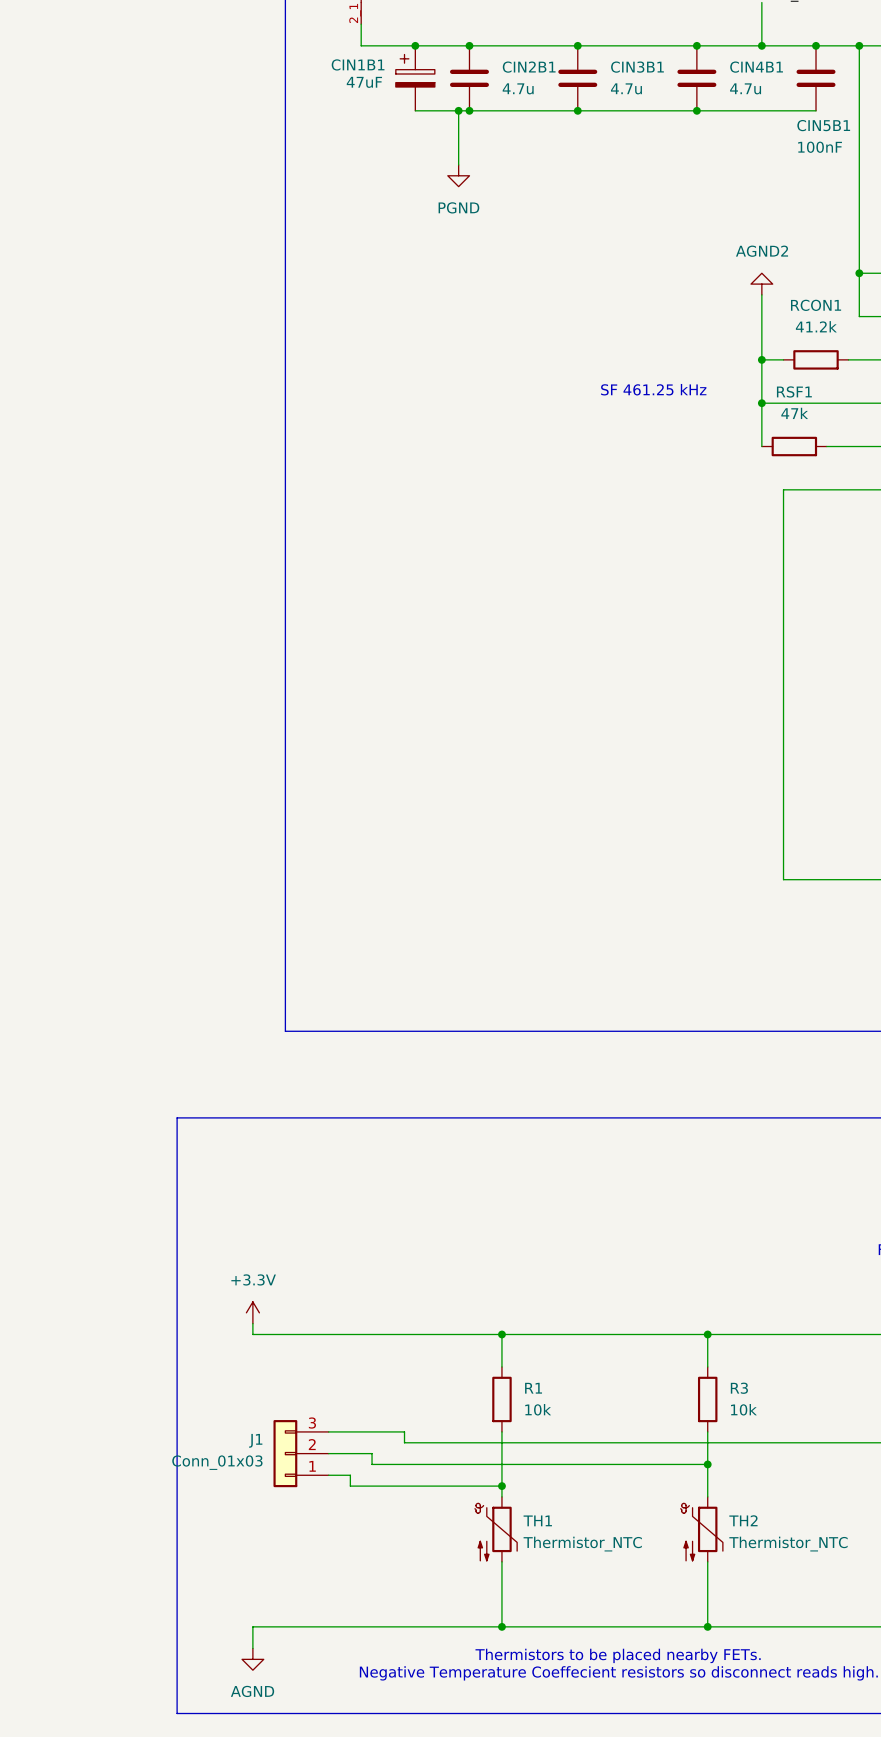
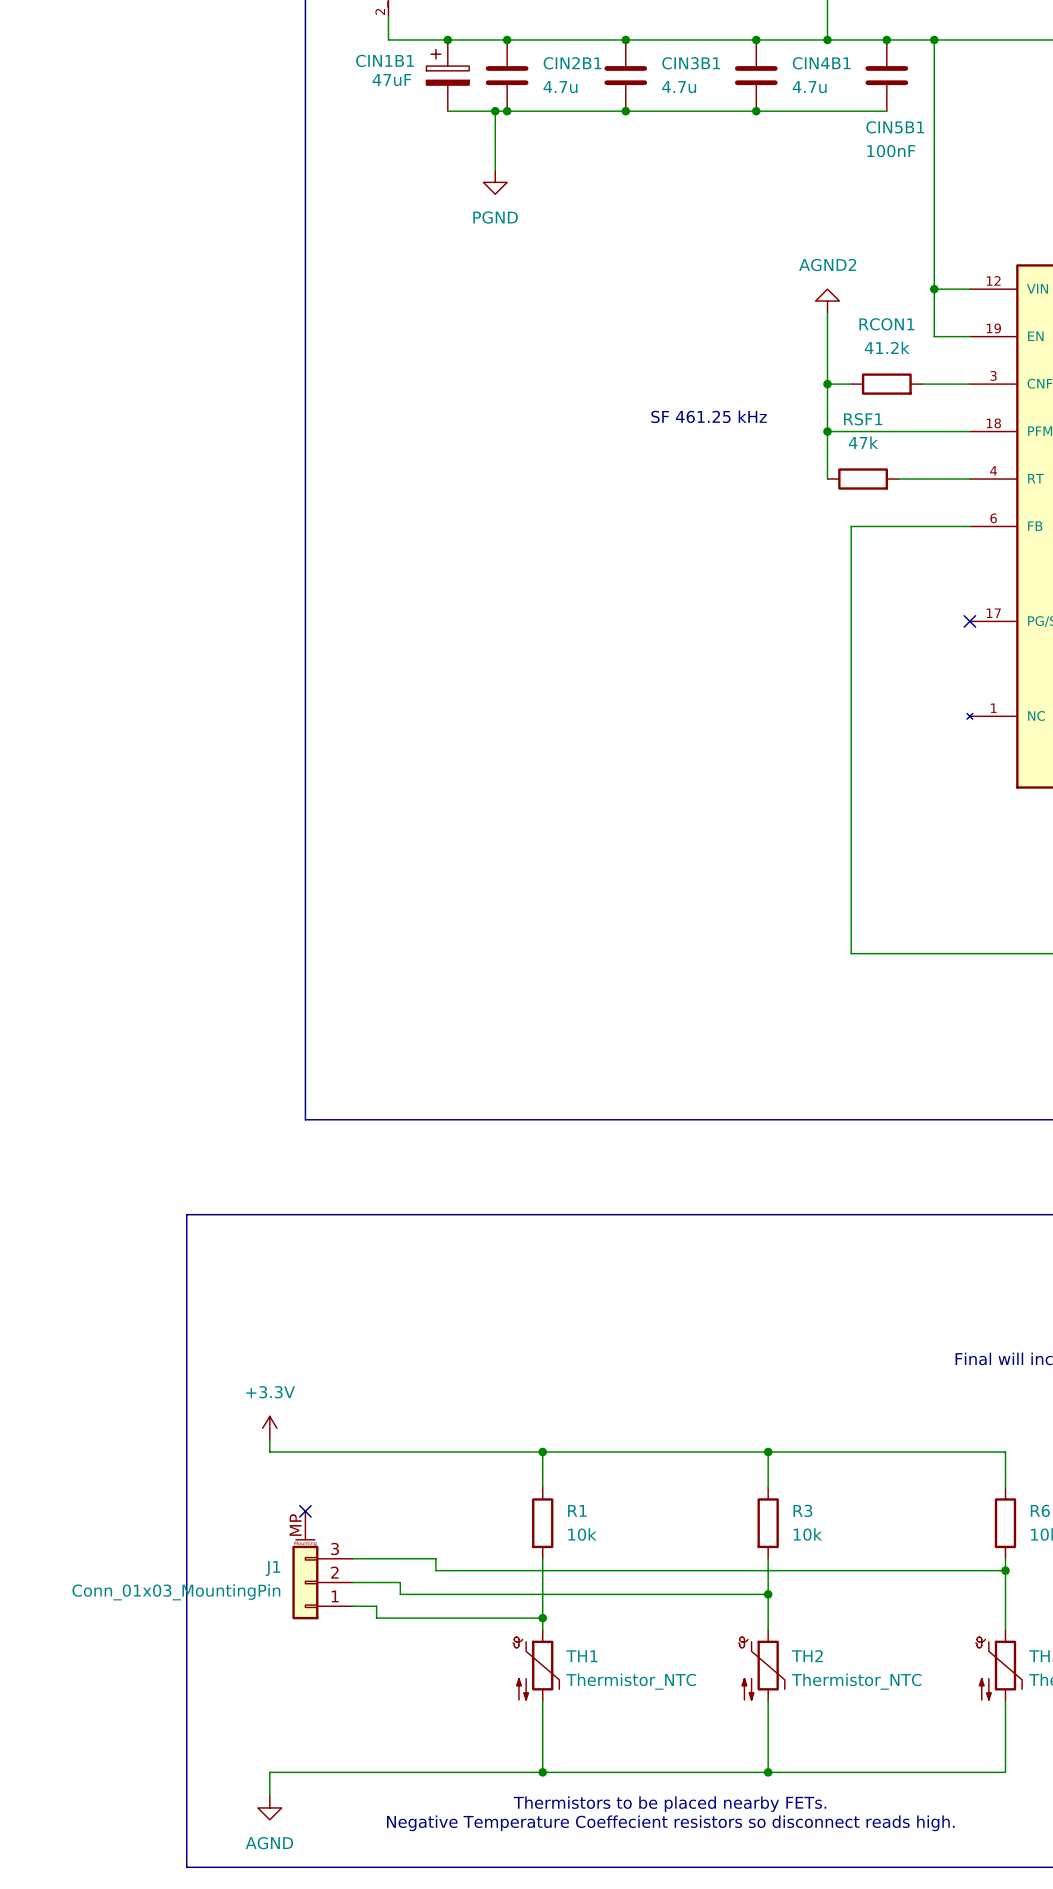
no-connect mark: none -> (305, 1511)
J1 symbol: [273, 1420, 329, 1488] -> [292, 1511, 353, 1620]
J1 value: Conn_01x03 (217, 1462) -> Conn_01x03_MountingPin (176, 1592)

